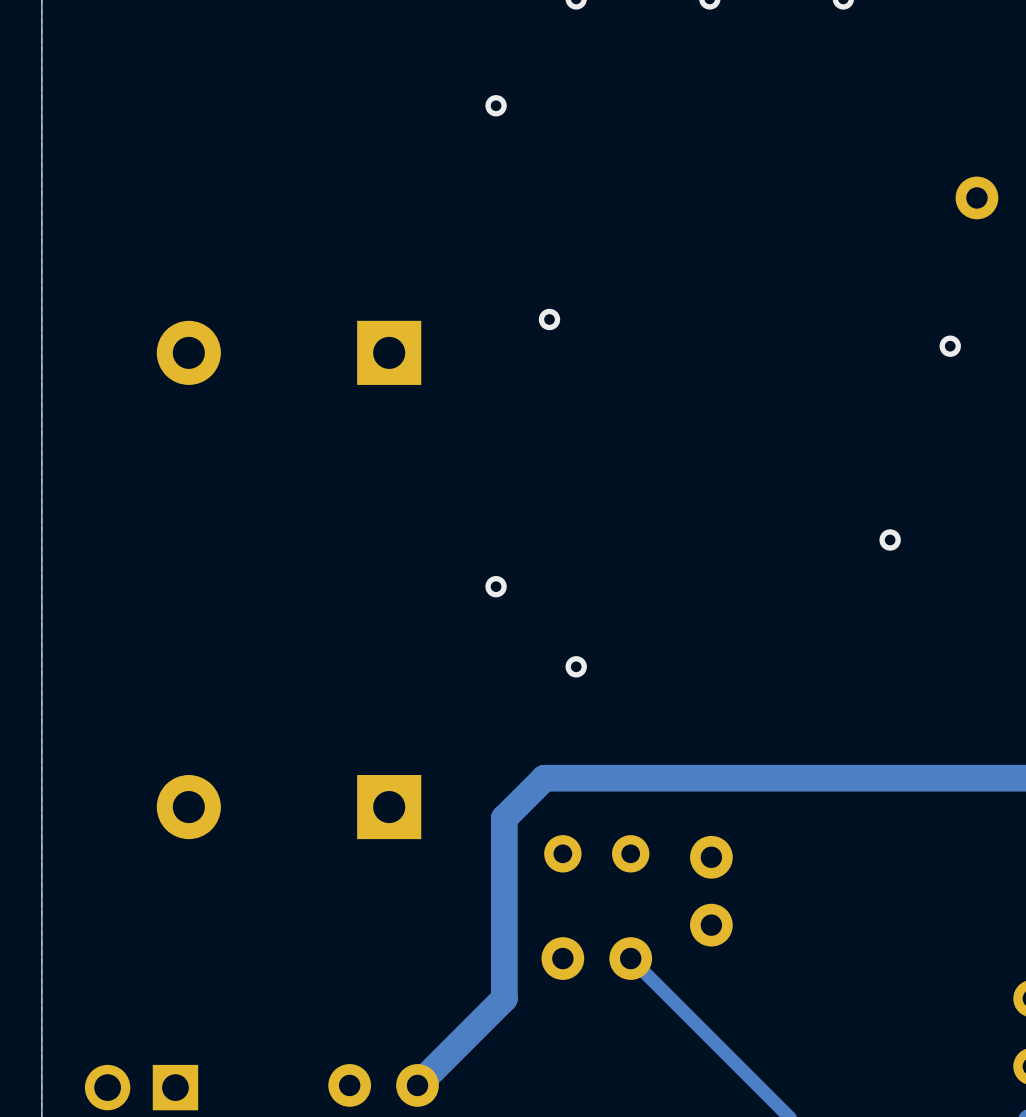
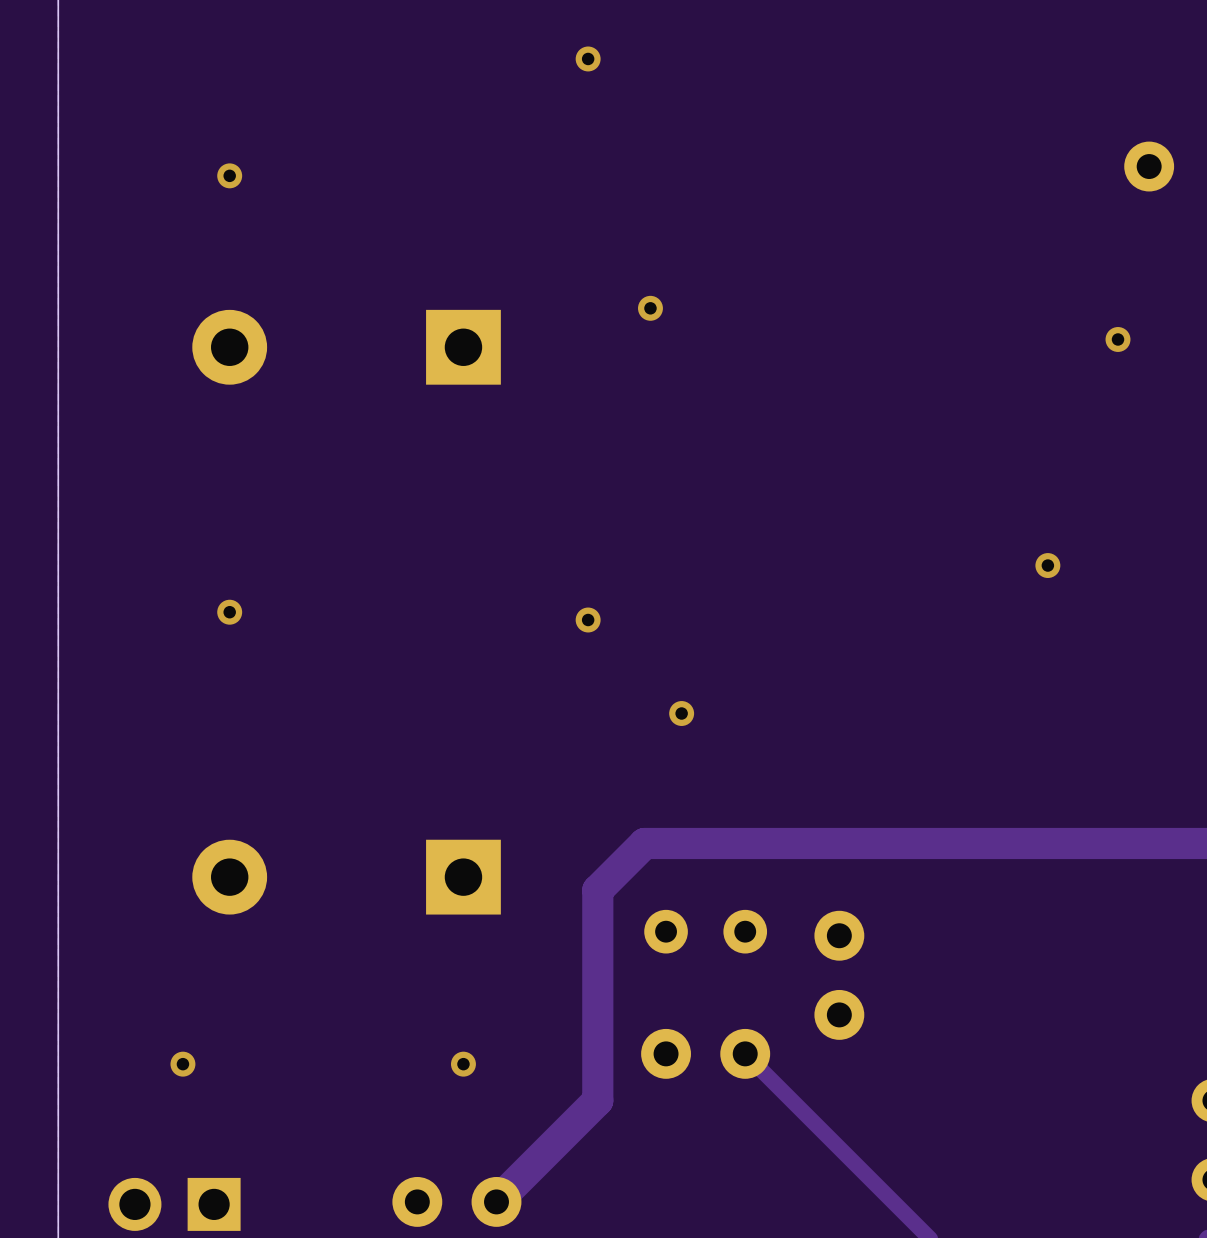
via: none -> (229, 175)
via: none -> (229, 612)
via: none -> (182, 1064)
via: none -> (463, 1064)

